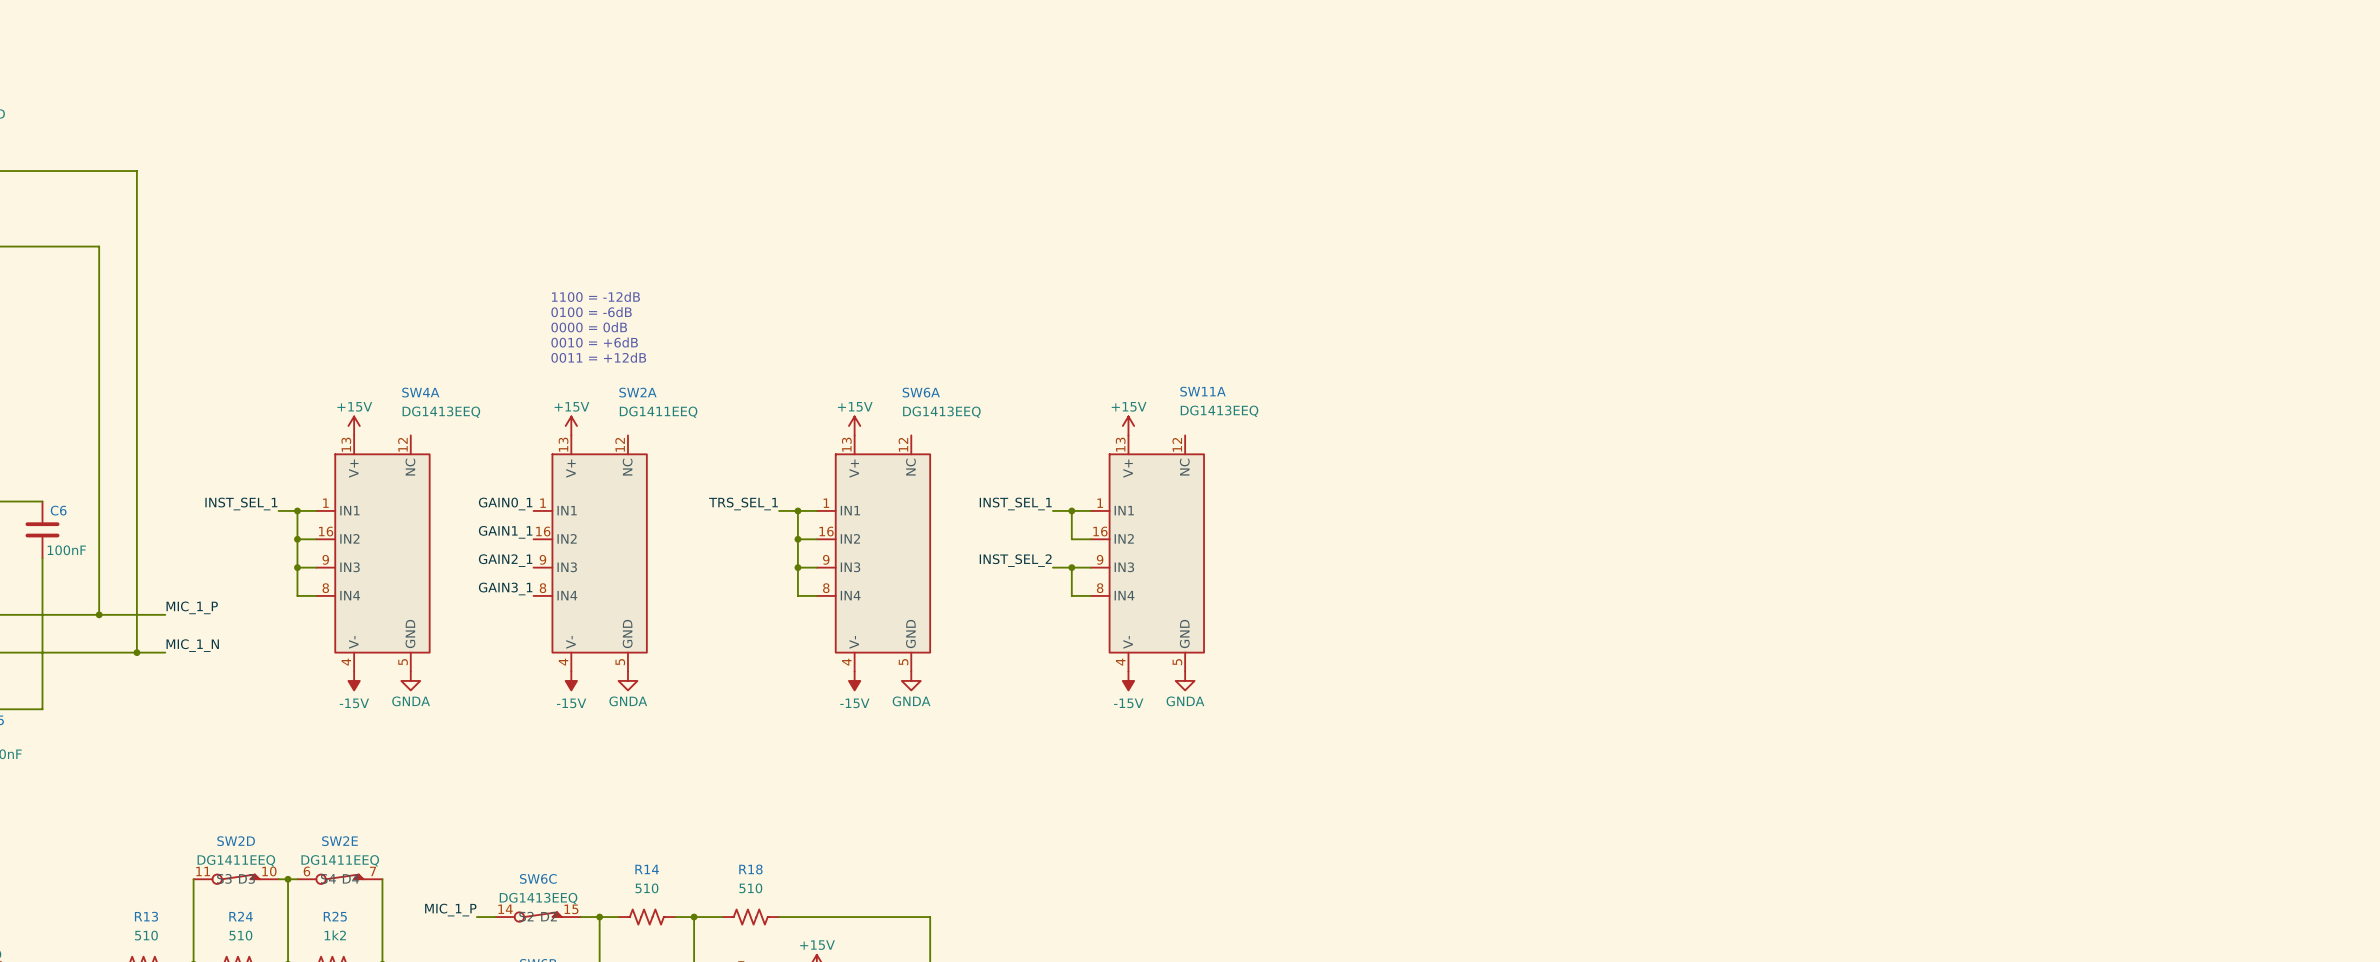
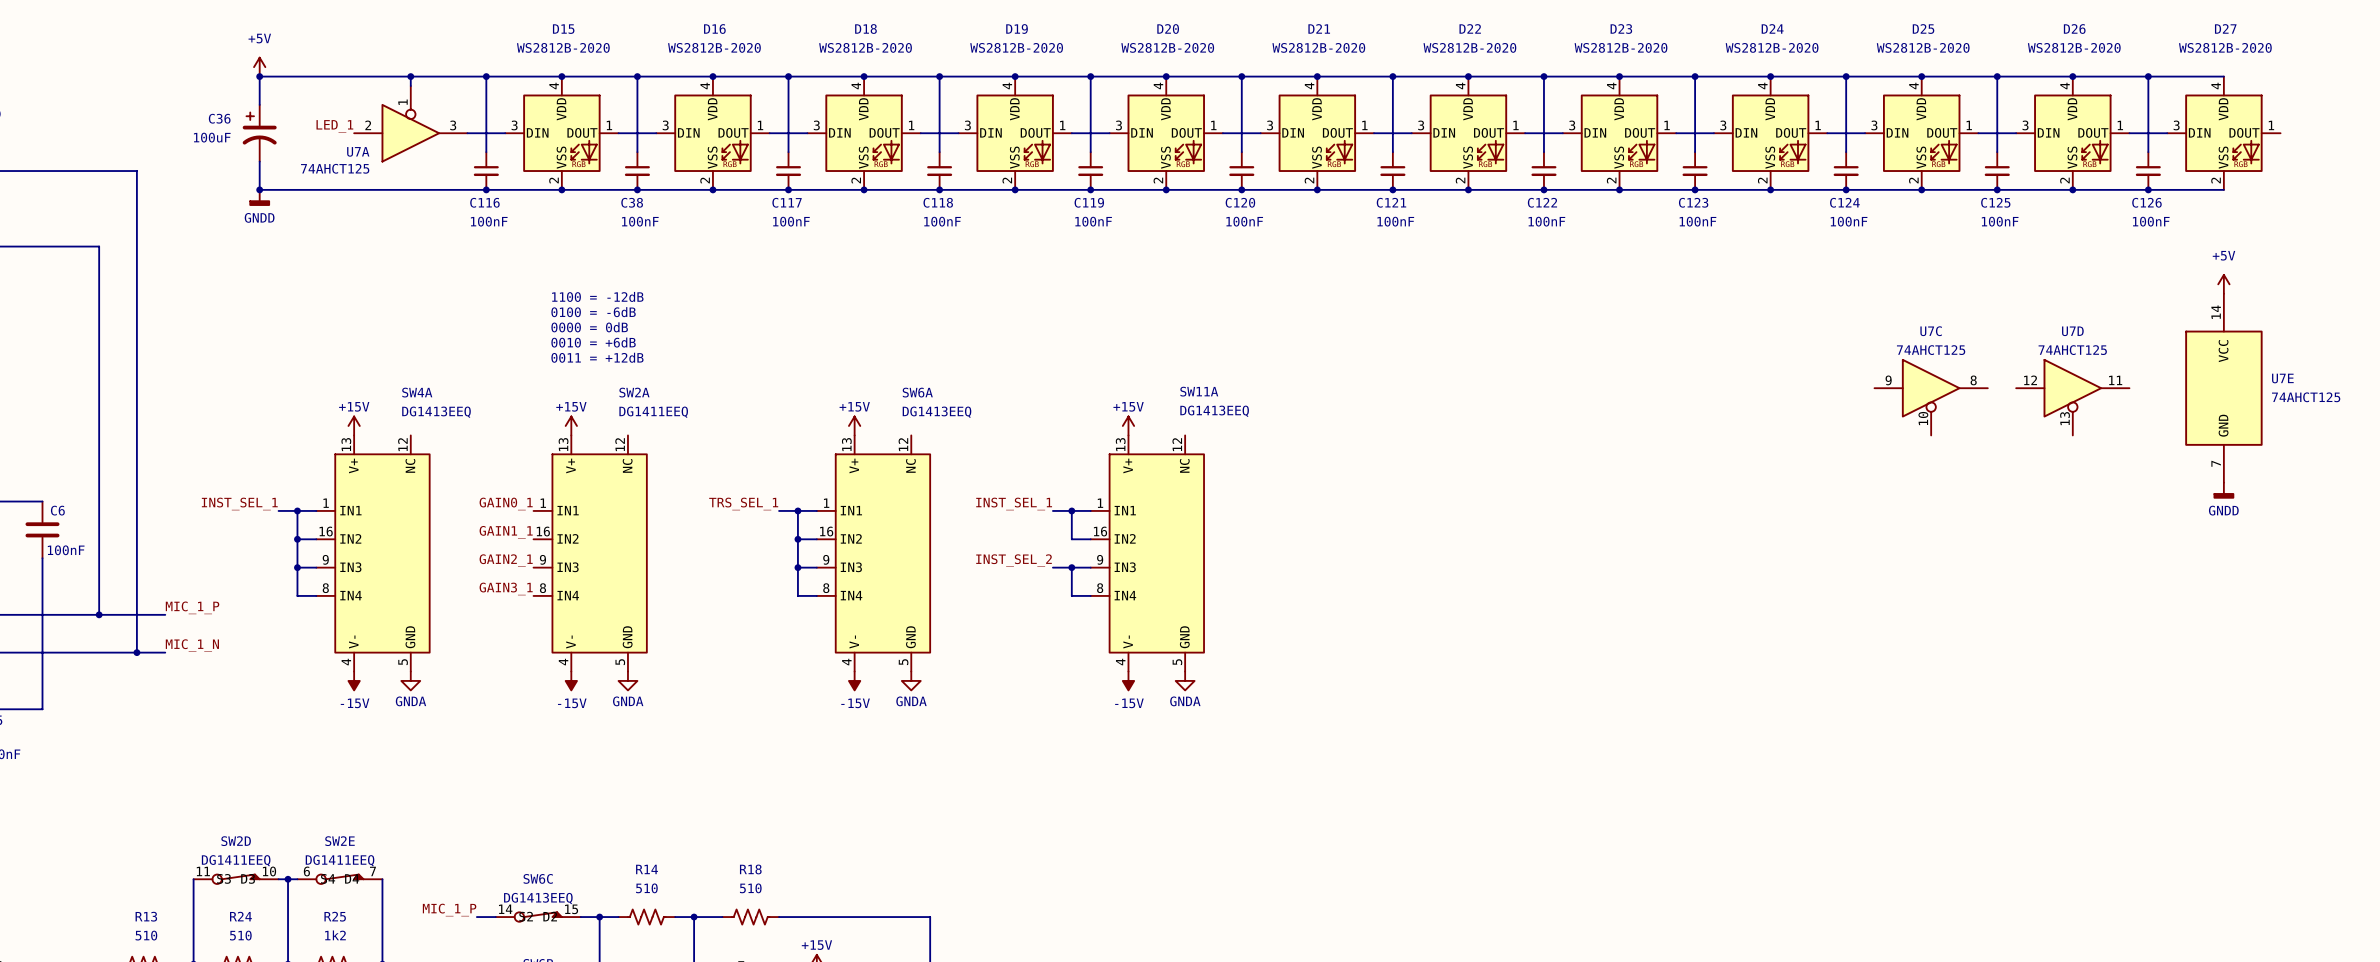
power symbol: none -> +5V (259, 67)
junction: none -> (259, 76)
wire: none -> (410, 76) (410, 86)
junction: none -> (410, 76)
wire: none -> (486, 76) (486, 152)
junction: none -> (486, 76)
junction: none -> (561, 76)
wire: none -> (637, 76) (637, 152)
junction: none -> (637, 76)
junction: none -> (712, 76)
wire: none -> (788, 76) (788, 152)
junction: none -> (788, 76)
junction: none -> (864, 76)
wire: none -> (939, 76) (939, 152)
junction: none -> (939, 76)
junction: none -> (1015, 76)
wire: none -> (1090, 76) (1090, 152)
junction: none -> (1090, 76)
junction: none -> (1166, 76)
wire: none -> (1241, 76) (1241, 152)
junction: none -> (1241, 76)
junction: none -> (1317, 76)
wire: none -> (1392, 76) (1392, 152)
junction: none -> (1392, 76)
junction: none -> (1468, 76)
wire: none -> (1543, 76) (1543, 152)
junction: none -> (1543, 76)
junction: none -> (1619, 76)
wire: none -> (1695, 76) (1695, 152)
junction: none -> (1695, 76)
junction: none -> (1770, 76)
wire: none -> (1846, 76) (1846, 152)
junction: none -> (1846, 76)
junction: none -> (1921, 76)
wire: none -> (1997, 76) (1997, 152)
junction: none -> (1997, 76)
junction: none -> (2072, 76)
wire: none -> (2148, 76) (2148, 152)
junction: none -> (2148, 76)
wire: none -> (2223, 76) (259, 76) (259, 104)
U7A: none -> 74AHCT125 (410, 124)
label: none -> LED_1 (334, 126)
C36: none -> 100uF (259, 133)
wire: none -> (467, 133) (505, 133)
D15: none -> WS2812B-2020 (561, 133)
wire: none -> (618, 133) (656, 133)
D16: none -> WS2812B-2020 (712, 133)
wire: none -> (769, 133) (807, 133)
D18: none -> WS2812B-2020 (864, 133)
wire: none -> (920, 133) (958, 133)
D19: none -> WS2812B-2020 (1015, 133)
wire: none -> (1071, 133) (1109, 133)
D20: none -> WS2812B-2020 (1166, 133)
wire: none -> (1222, 133) (1260, 133)
D21: none -> WS2812B-2020 (1317, 133)
wire: none -> (1374, 133) (1411, 133)
D22: none -> WS2812B-2020 (1468, 133)
wire: none -> (1525, 133) (1562, 133)
D23: none -> WS2812B-2020 (1619, 133)
wire: none -> (1676, 133) (1713, 133)
D24: none -> WS2812B-2020 (1770, 133)
wire: none -> (1827, 133) (1865, 133)
D25: none -> WS2812B-2020 (1921, 133)
wire: none -> (1978, 133) (2016, 133)
D26: none -> WS2812B-2020 (2072, 133)
wire: none -> (2129, 133) (2167, 133)
D27: none -> WS2812B-2020 (2223, 133)
wire: none -> (259, 161) (259, 189) (2223, 189)
C116: none -> 100nF (486, 171)
C38: none -> 100nF (637, 171)
C117: none -> 100nF (788, 171)
C118: none -> 100nF (939, 171)
C119: none -> 100nF (1090, 171)
C120: none -> 100nF (1241, 171)
C121: none -> 100nF (1392, 171)
C122: none -> 100nF (1543, 171)
C123: none -> 100nF (1695, 171)
C124: none -> 100nF (1846, 171)
C125: none -> 100nF (1997, 171)
C126: none -> 100nF (2148, 171)
junction: none -> (259, 189)
junction: none -> (486, 189)
junction: none -> (561, 189)
junction: none -> (637, 189)
junction: none -> (712, 189)
junction: none -> (788, 189)
junction: none -> (864, 189)
junction: none -> (939, 189)
junction: none -> (1015, 189)
junction: none -> (1090, 189)
junction: none -> (1166, 189)
junction: none -> (1241, 189)
junction: none -> (1317, 189)
junction: none -> (1392, 189)
junction: none -> (1468, 189)
junction: none -> (1543, 189)
junction: none -> (1619, 189)
junction: none -> (1695, 189)
junction: none -> (1770, 189)
junction: none -> (1846, 189)
junction: none -> (1921, 189)
junction: none -> (1997, 189)
junction: none -> (2072, 189)
junction: none -> (2148, 189)
power symbol: none -> GNDD (259, 197)
power symbol: none -> +5V (2223, 284)
U7E: none -> 74AHCT125 (2223, 388)
U7C: none -> 74AHCT125 (1931, 397)
U7D: none -> 74AHCT125 (2072, 397)
power symbol: none -> GNDD (2223, 490)

